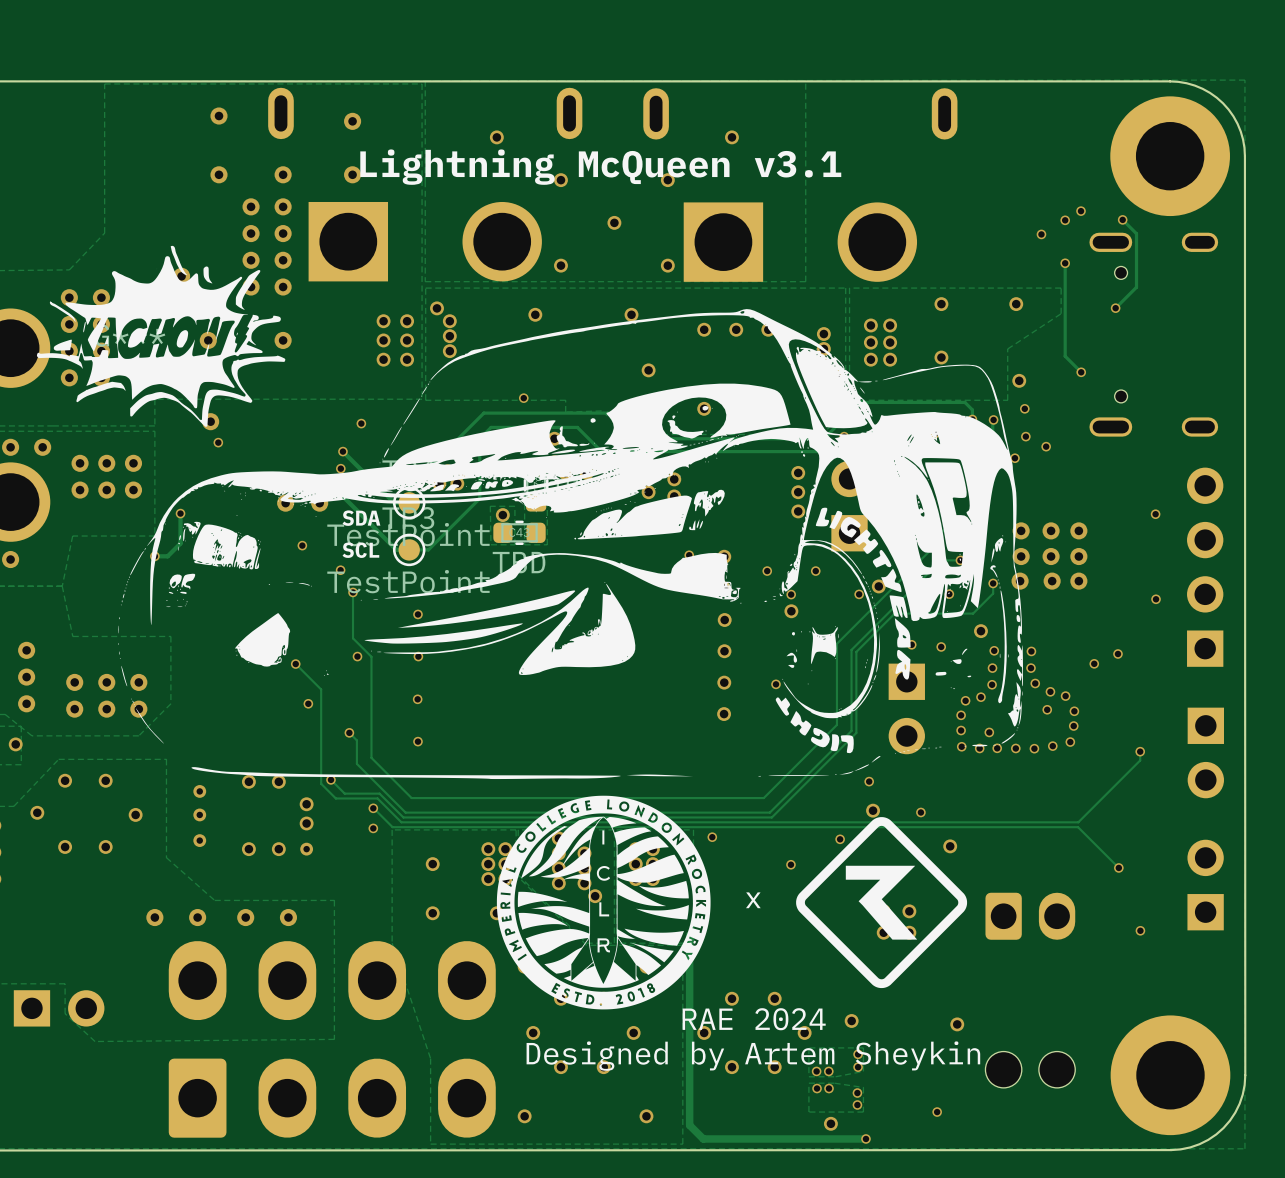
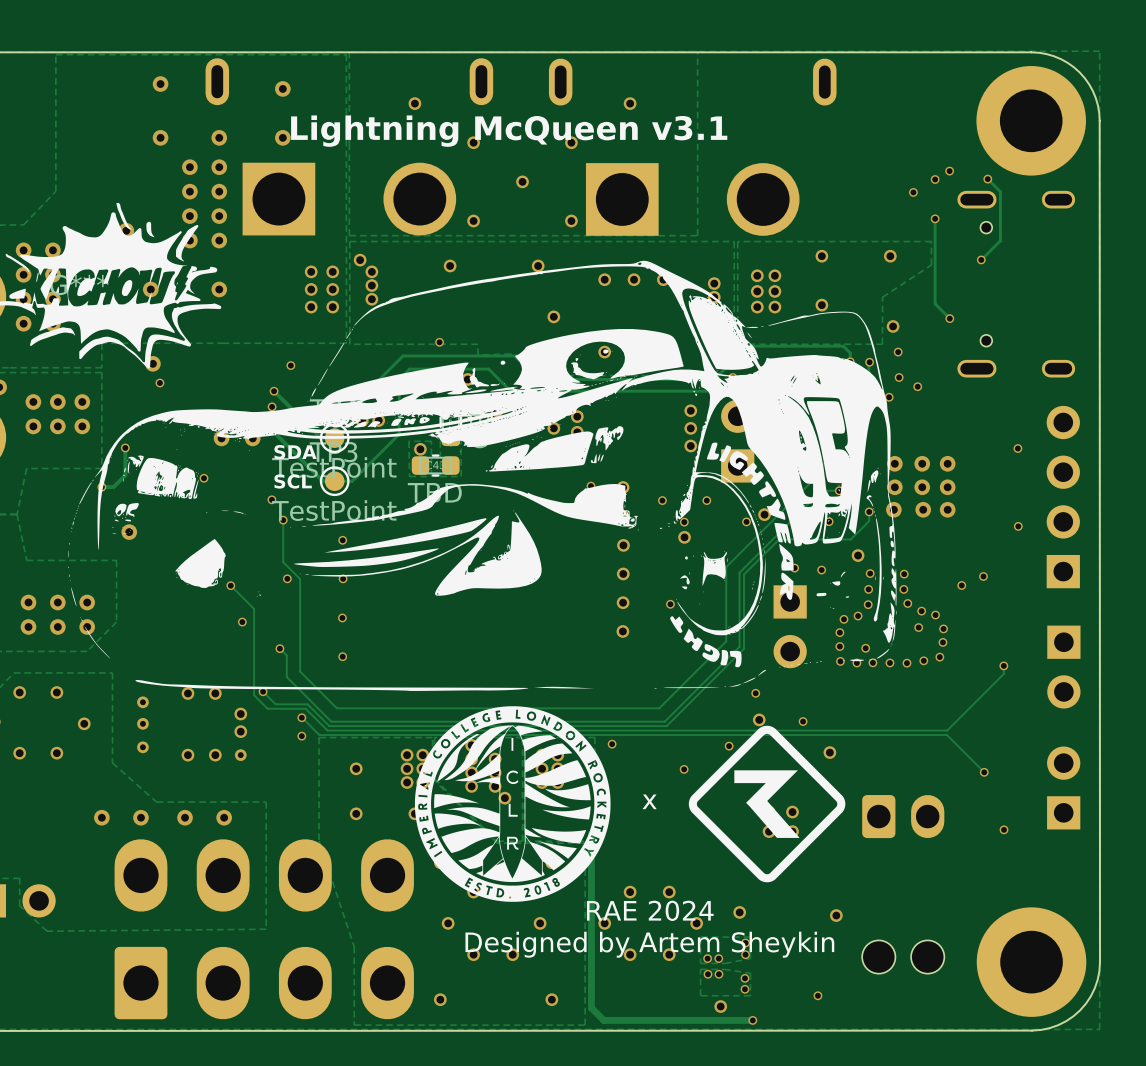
via position: (302, 545) -> (204, 478)
via: none -> (129, 532)

